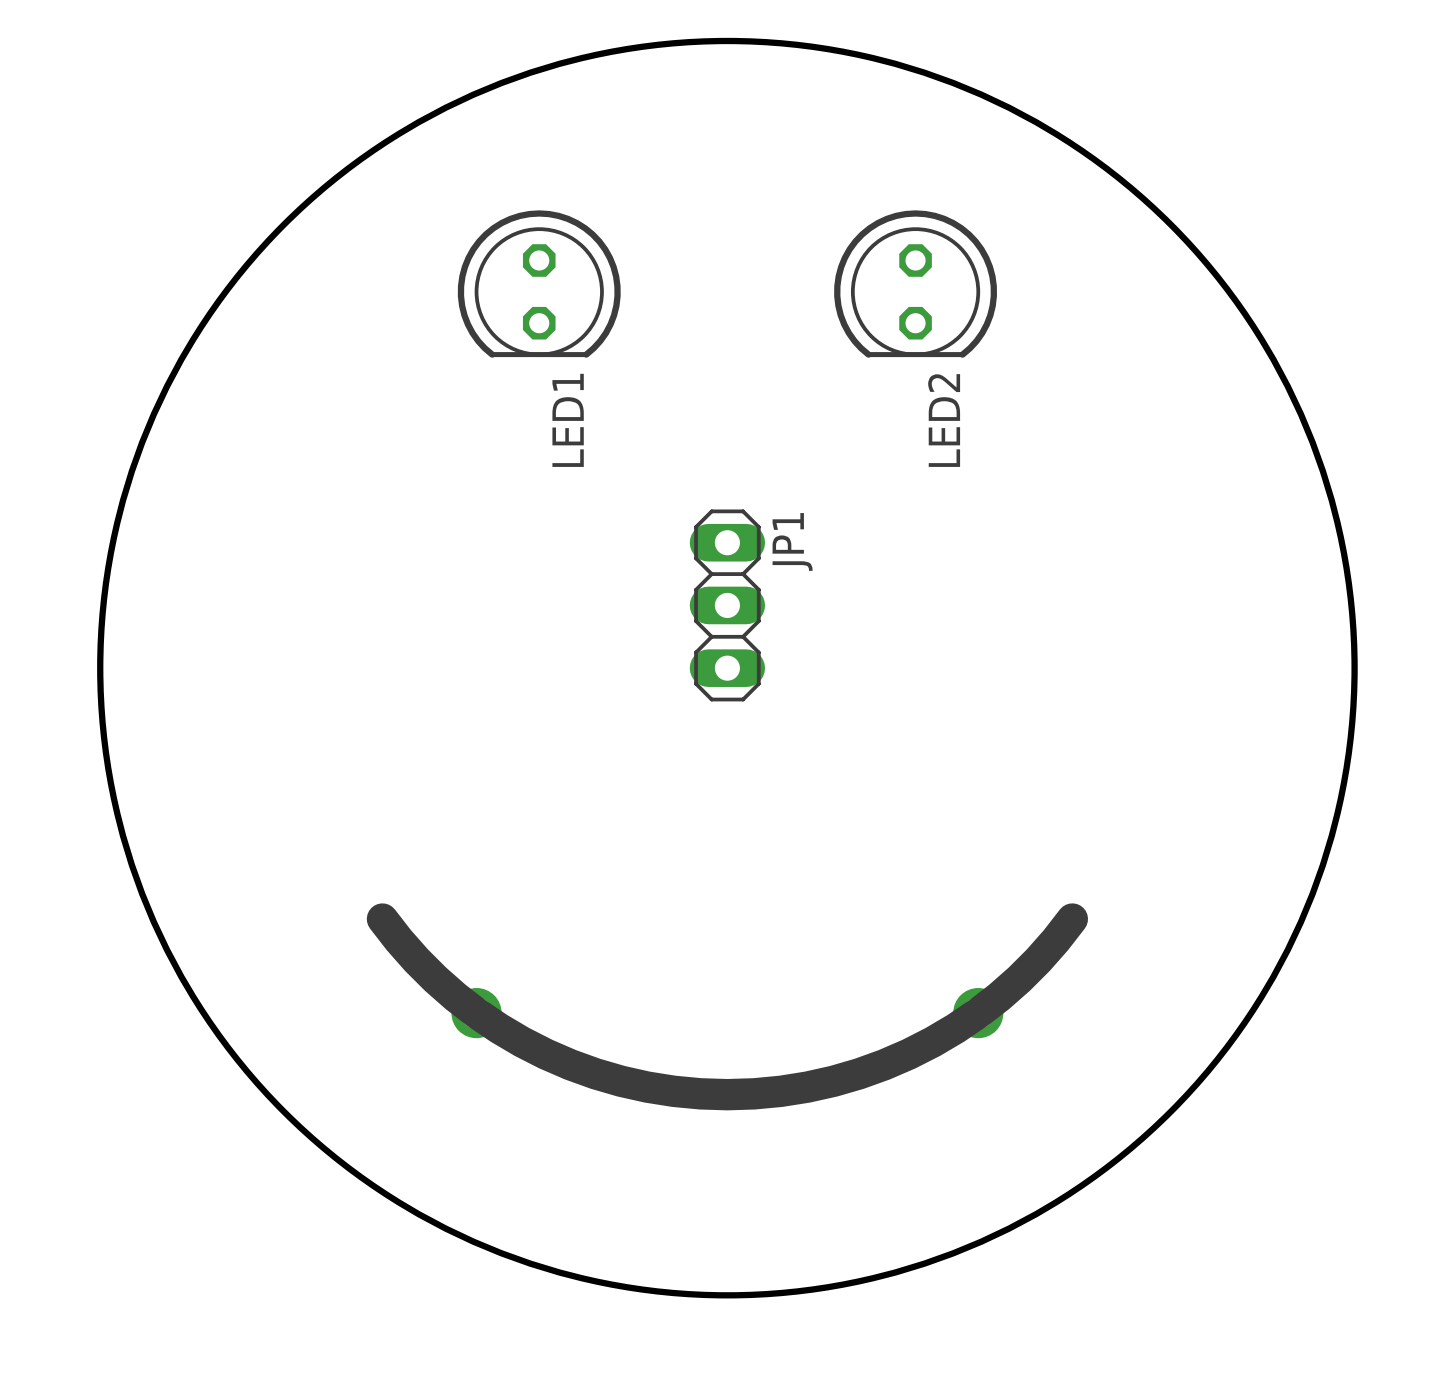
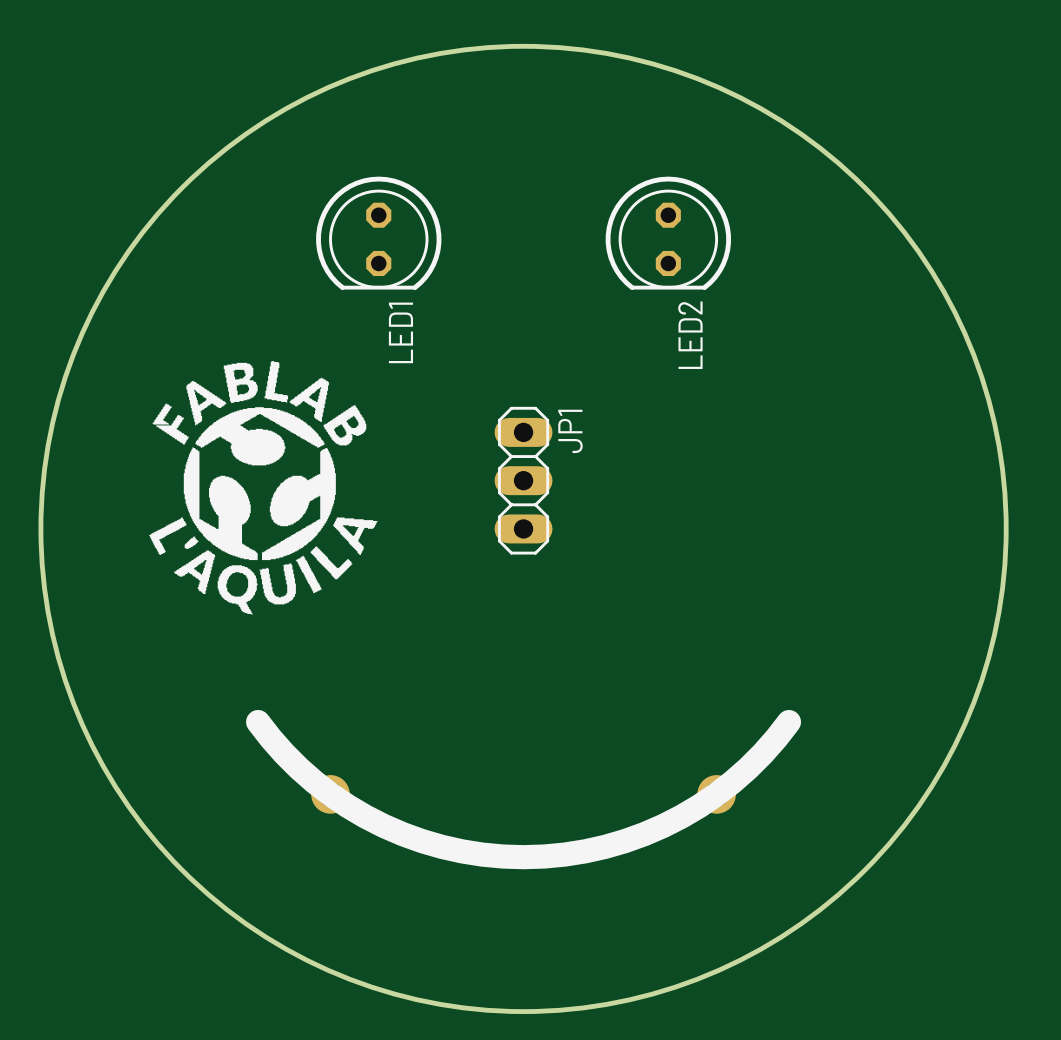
drawing: none -> [149, 361, 378, 615]

